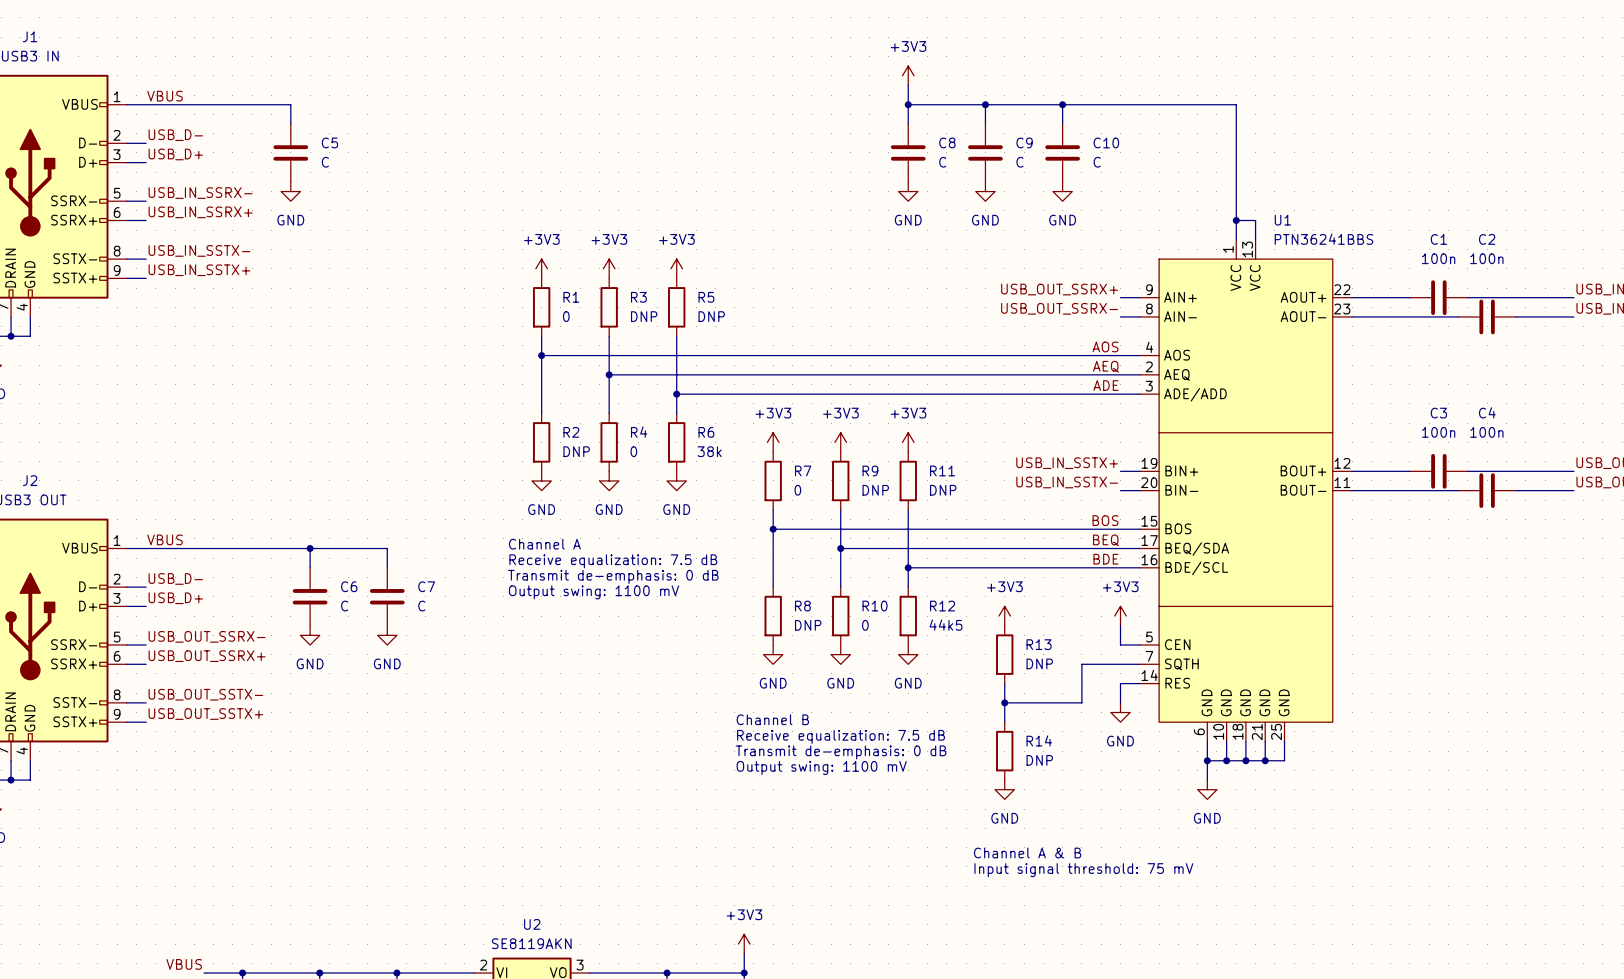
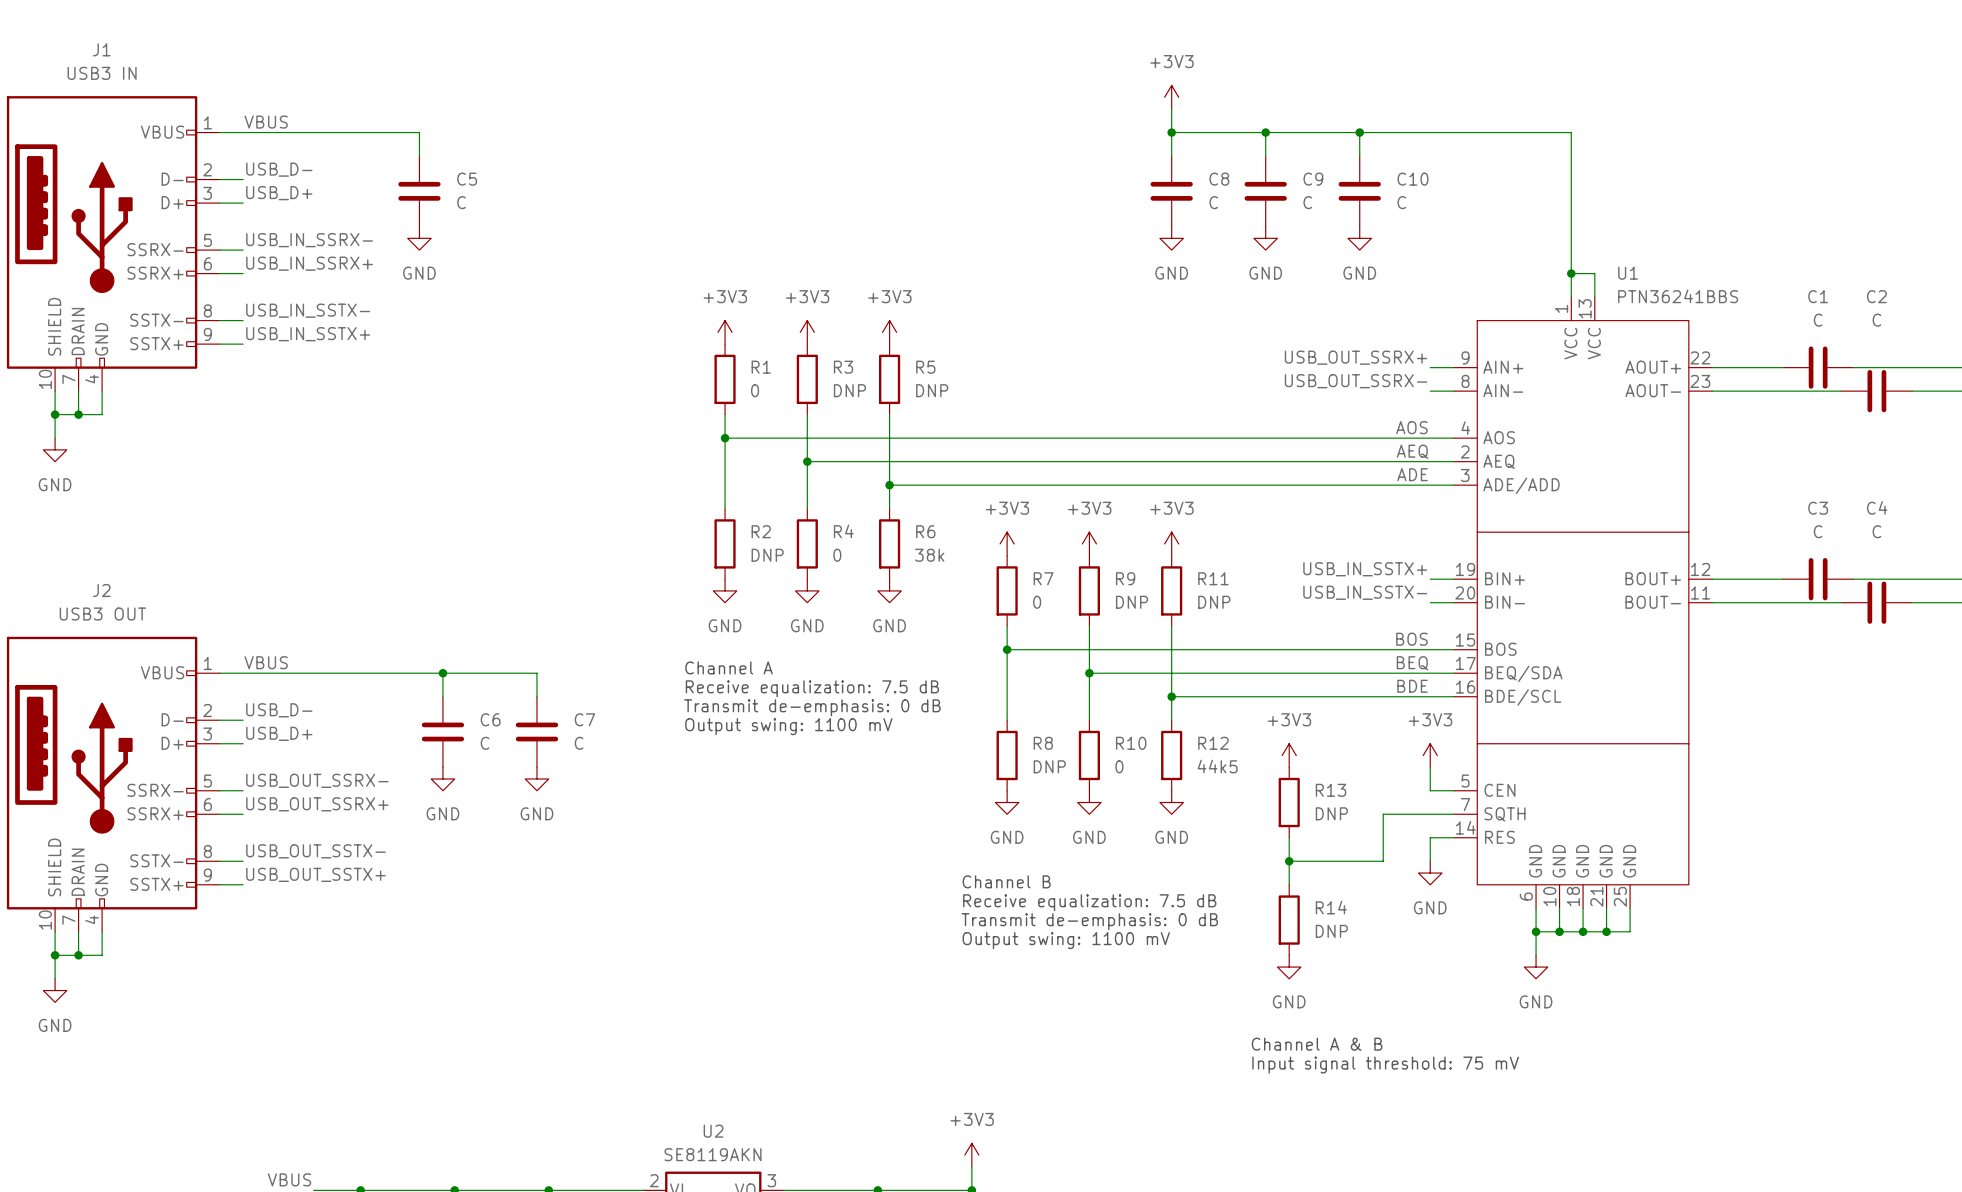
C1 value: 100n (1438, 258) -> C (1818, 320)
C2 value: 100n (1486, 258) -> C (1876, 320)
C3 value: 100n (1438, 432) -> C (1818, 531)
C4 value: 100n (1486, 432) -> C (1876, 531)

